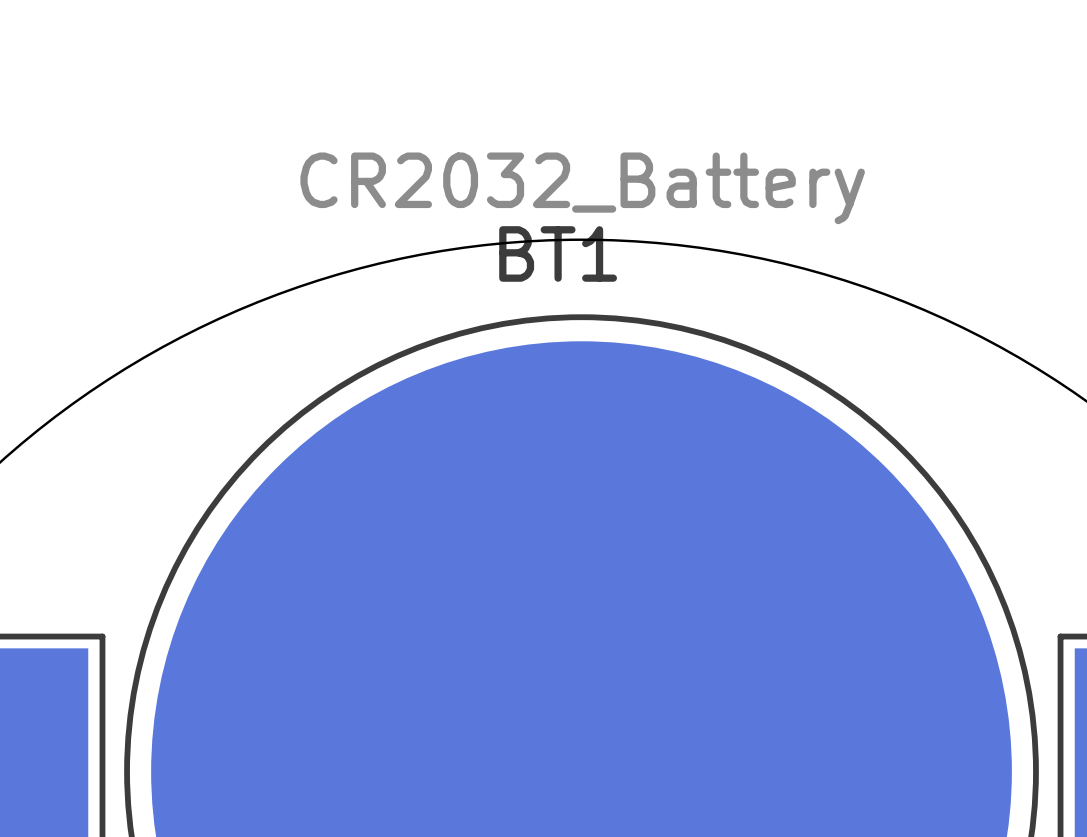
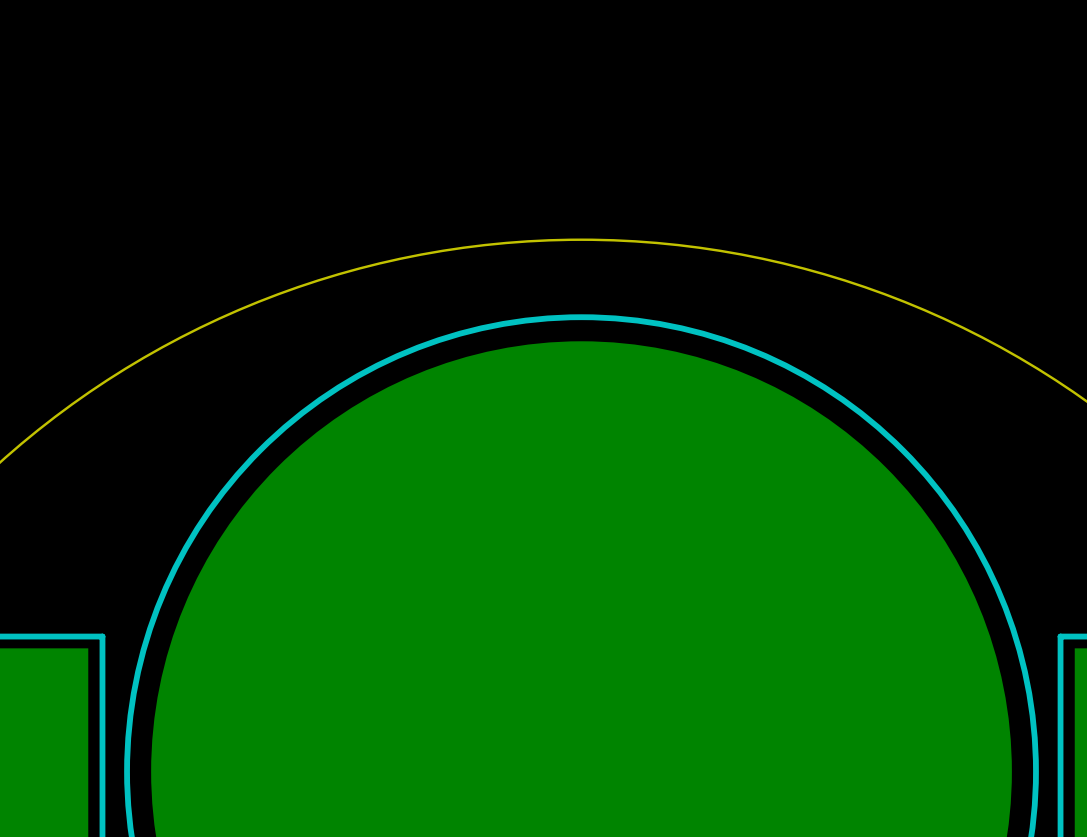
BT1 value: CR2032_Battery (582, 188) -> none
BT1 name: BT1 (558, 253) -> none

